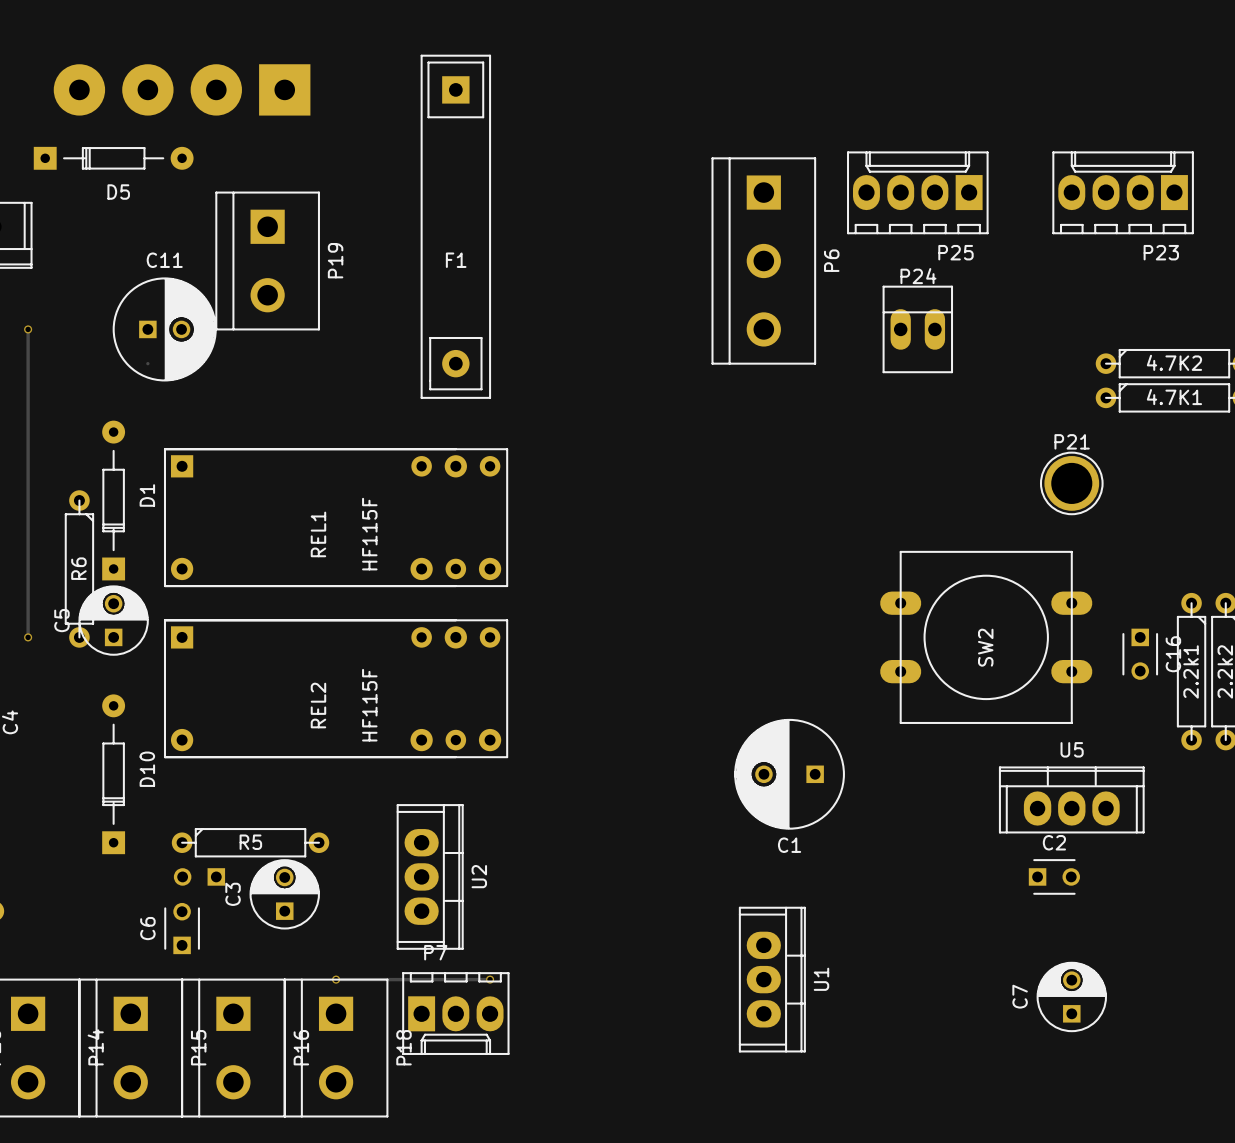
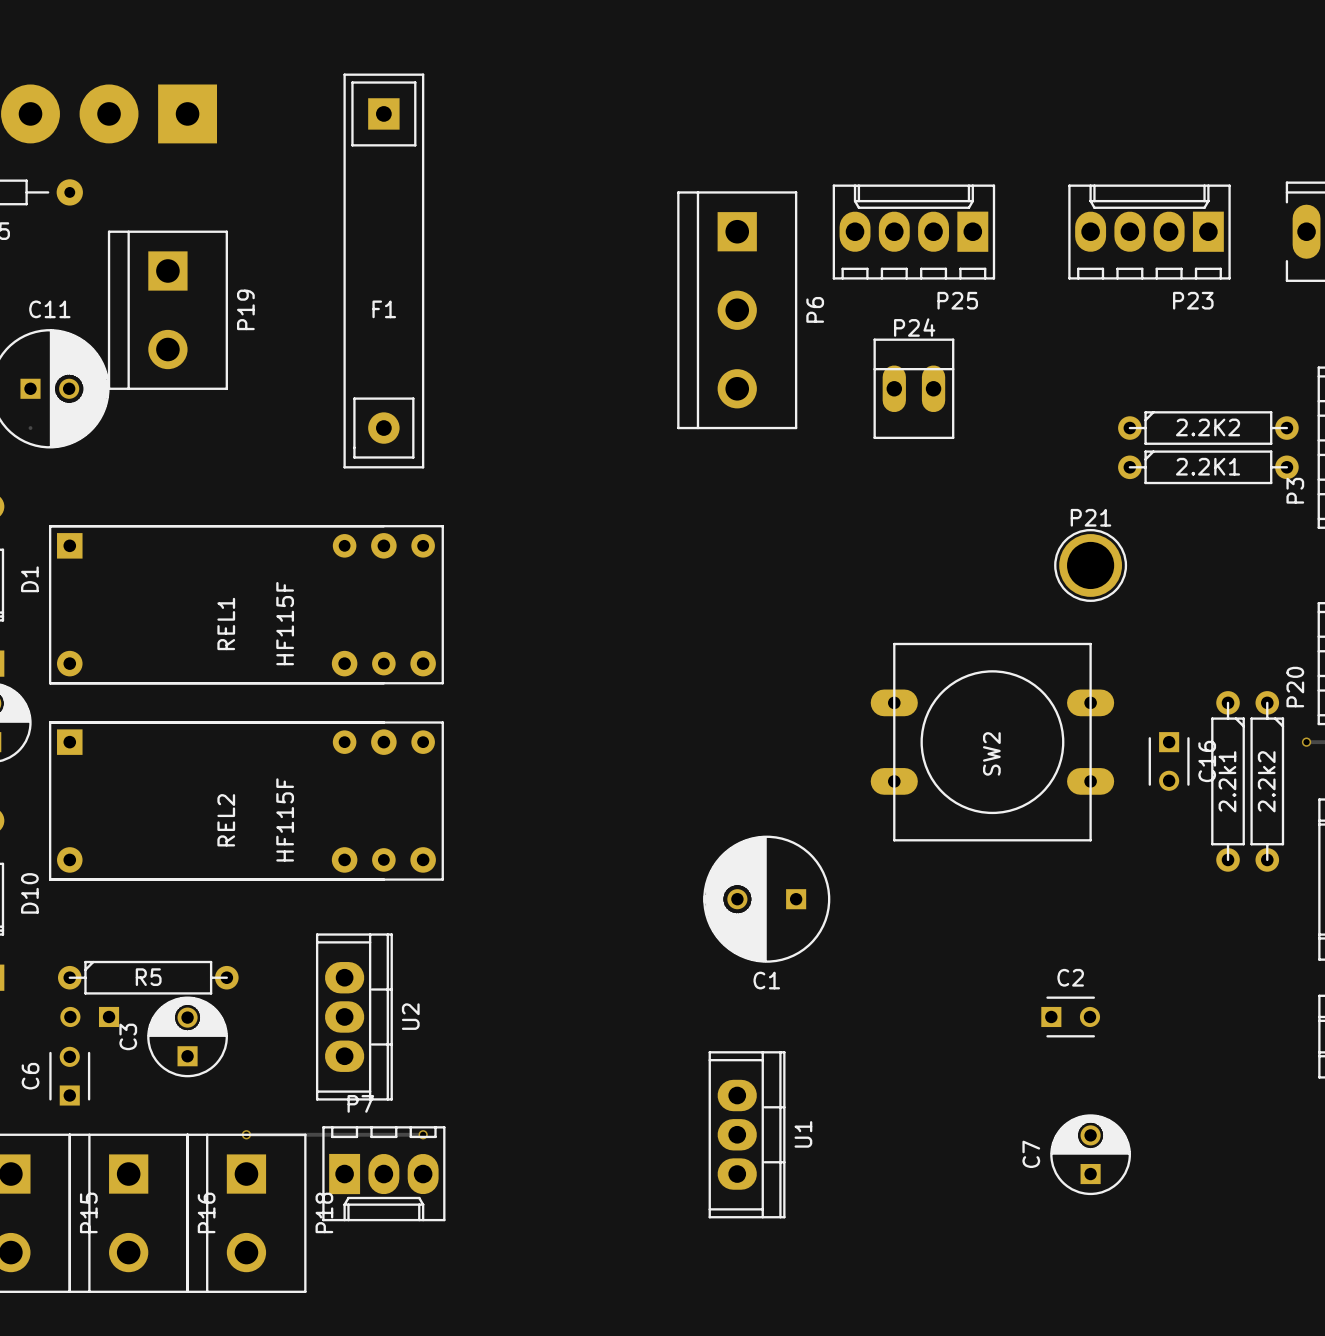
4.7K2 name: 4.7K2 (1174, 362) -> 2.2K2 (1208, 427)
4.7K1 name: 4.7K1 (1174, 397) -> 2.2K1 (1208, 466)
U5: (1071, 799) -> none

